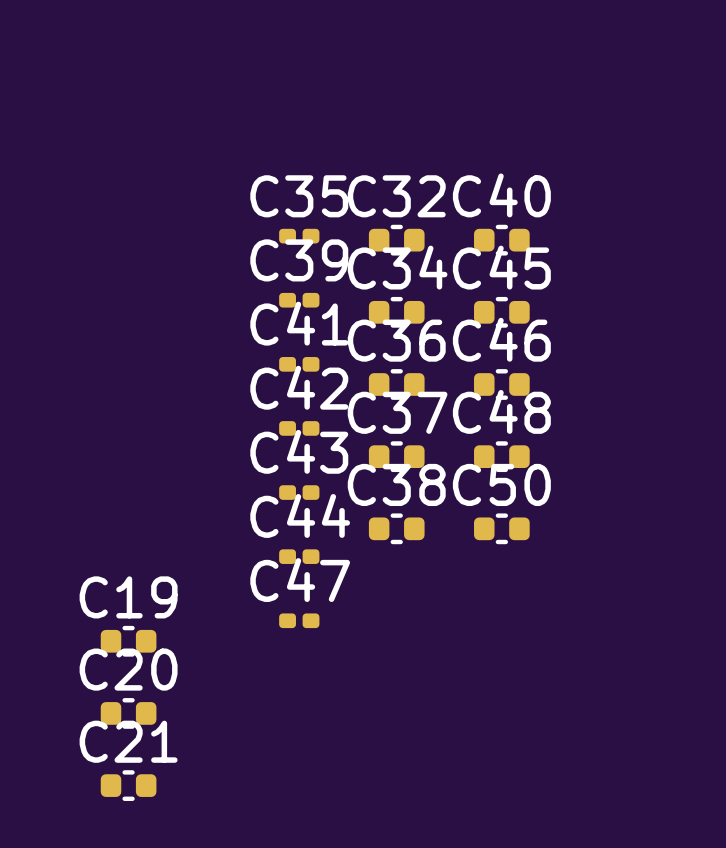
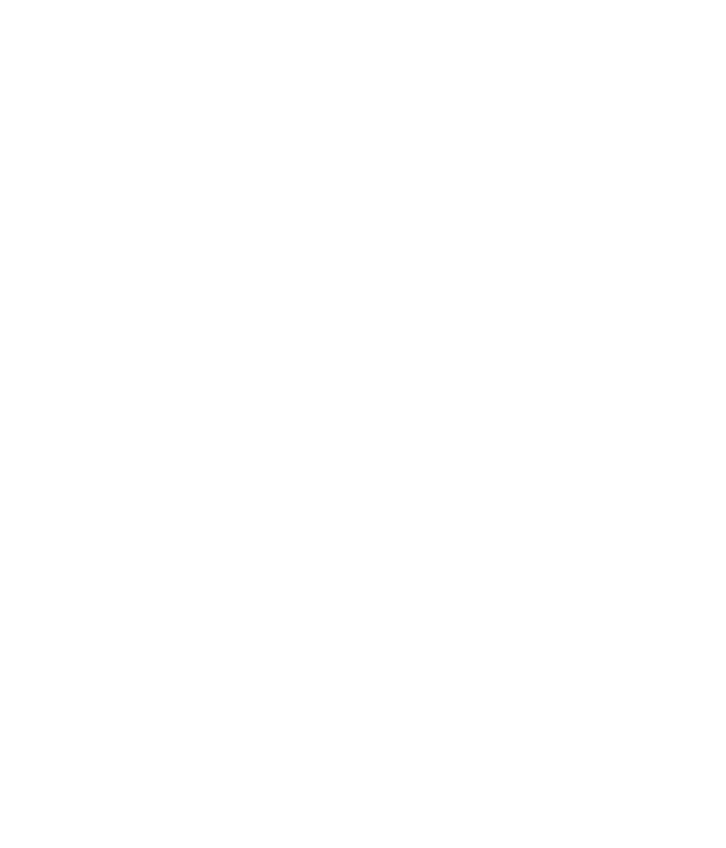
C35: (299, 236) -> none
C32: (396, 240) -> none
C40: (501, 240) -> none
C39: (299, 300) -> none
C34: (396, 312) -> none
C45: (501, 312) -> none
C41: (299, 364) -> none
C36: (396, 384) -> none
C46: (501, 384) -> none
C42: (299, 428) -> none
C37: (396, 456) -> none
C48: (501, 456) -> none
C43: (299, 492) -> none
C38: (396, 528) -> none
C50: (501, 528) -> none
C44: (299, 556) -> none
C47: (299, 620) -> none
C19: (128, 641) -> none
C20: (128, 713) -> none
C21: (128, 785) -> none

